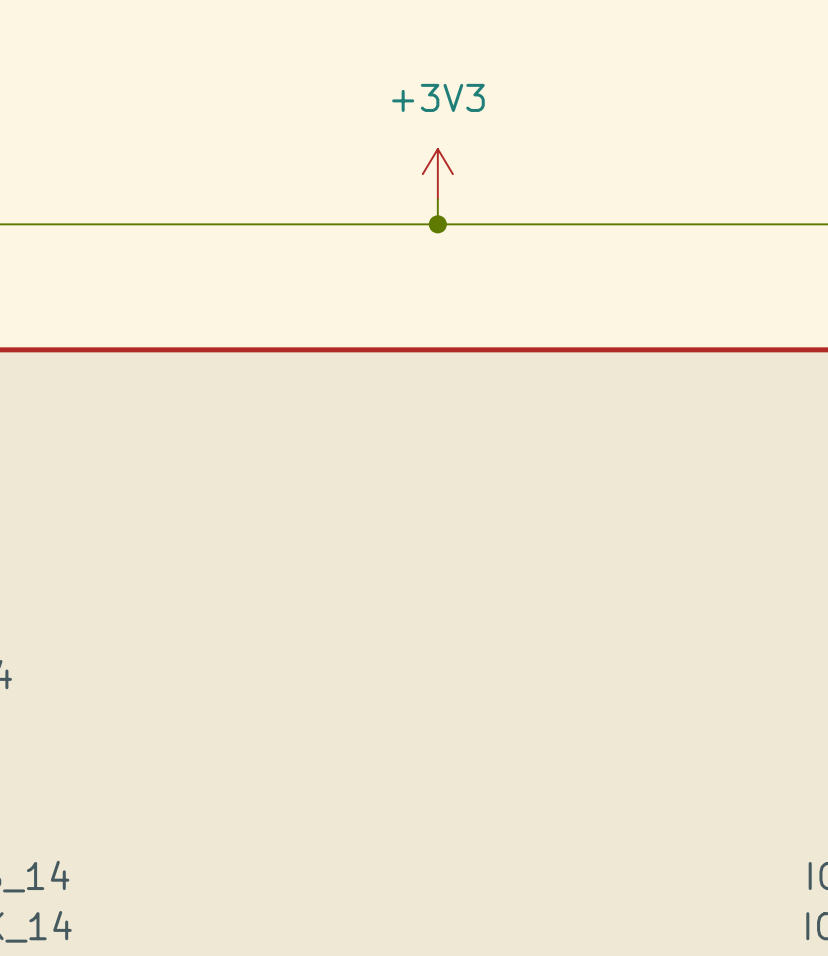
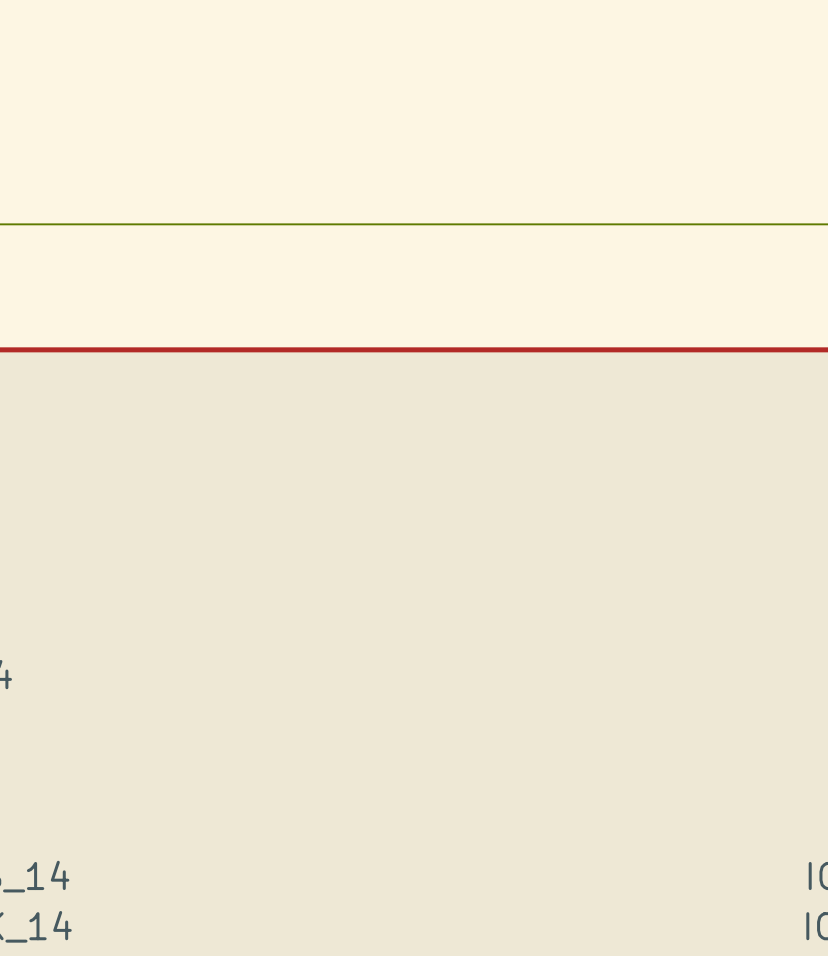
power symbol: +3V3 (437, 174) -> none
wire: (437, 199) (437, 224) -> none
junction: (437, 224) -> none

